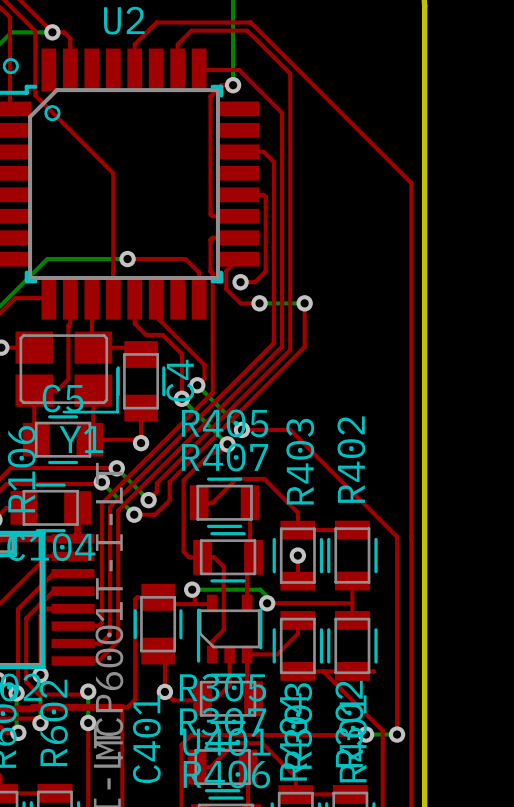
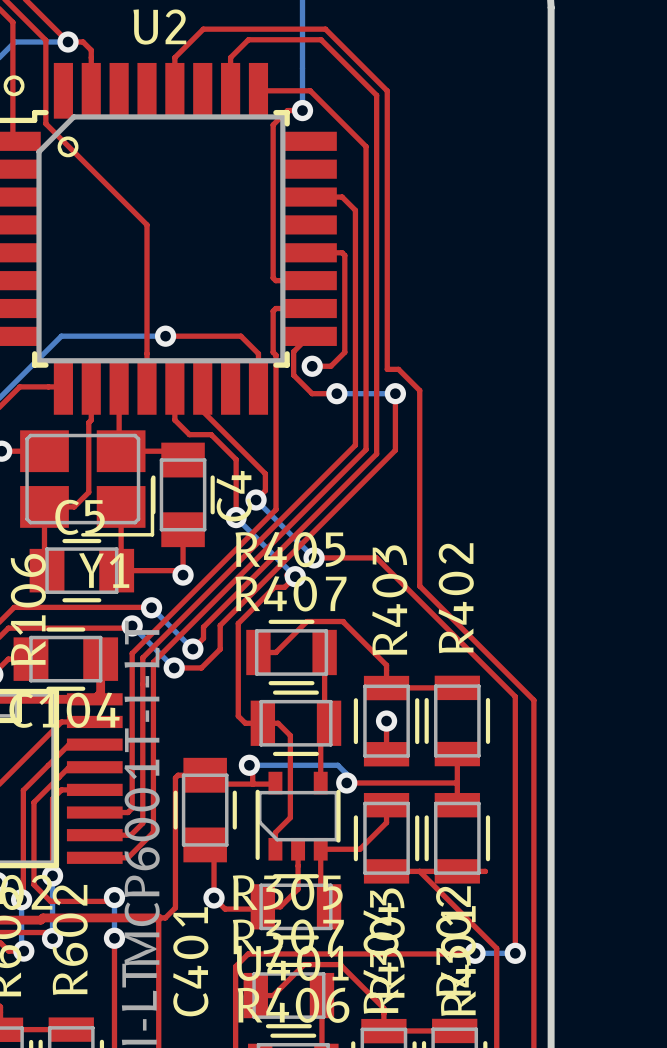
top track: (298, 70) (411, 183) (411, 539) -> (387, 90) (387, 369) (398, 369) (419, 390) (419, 586) (533, 700)

